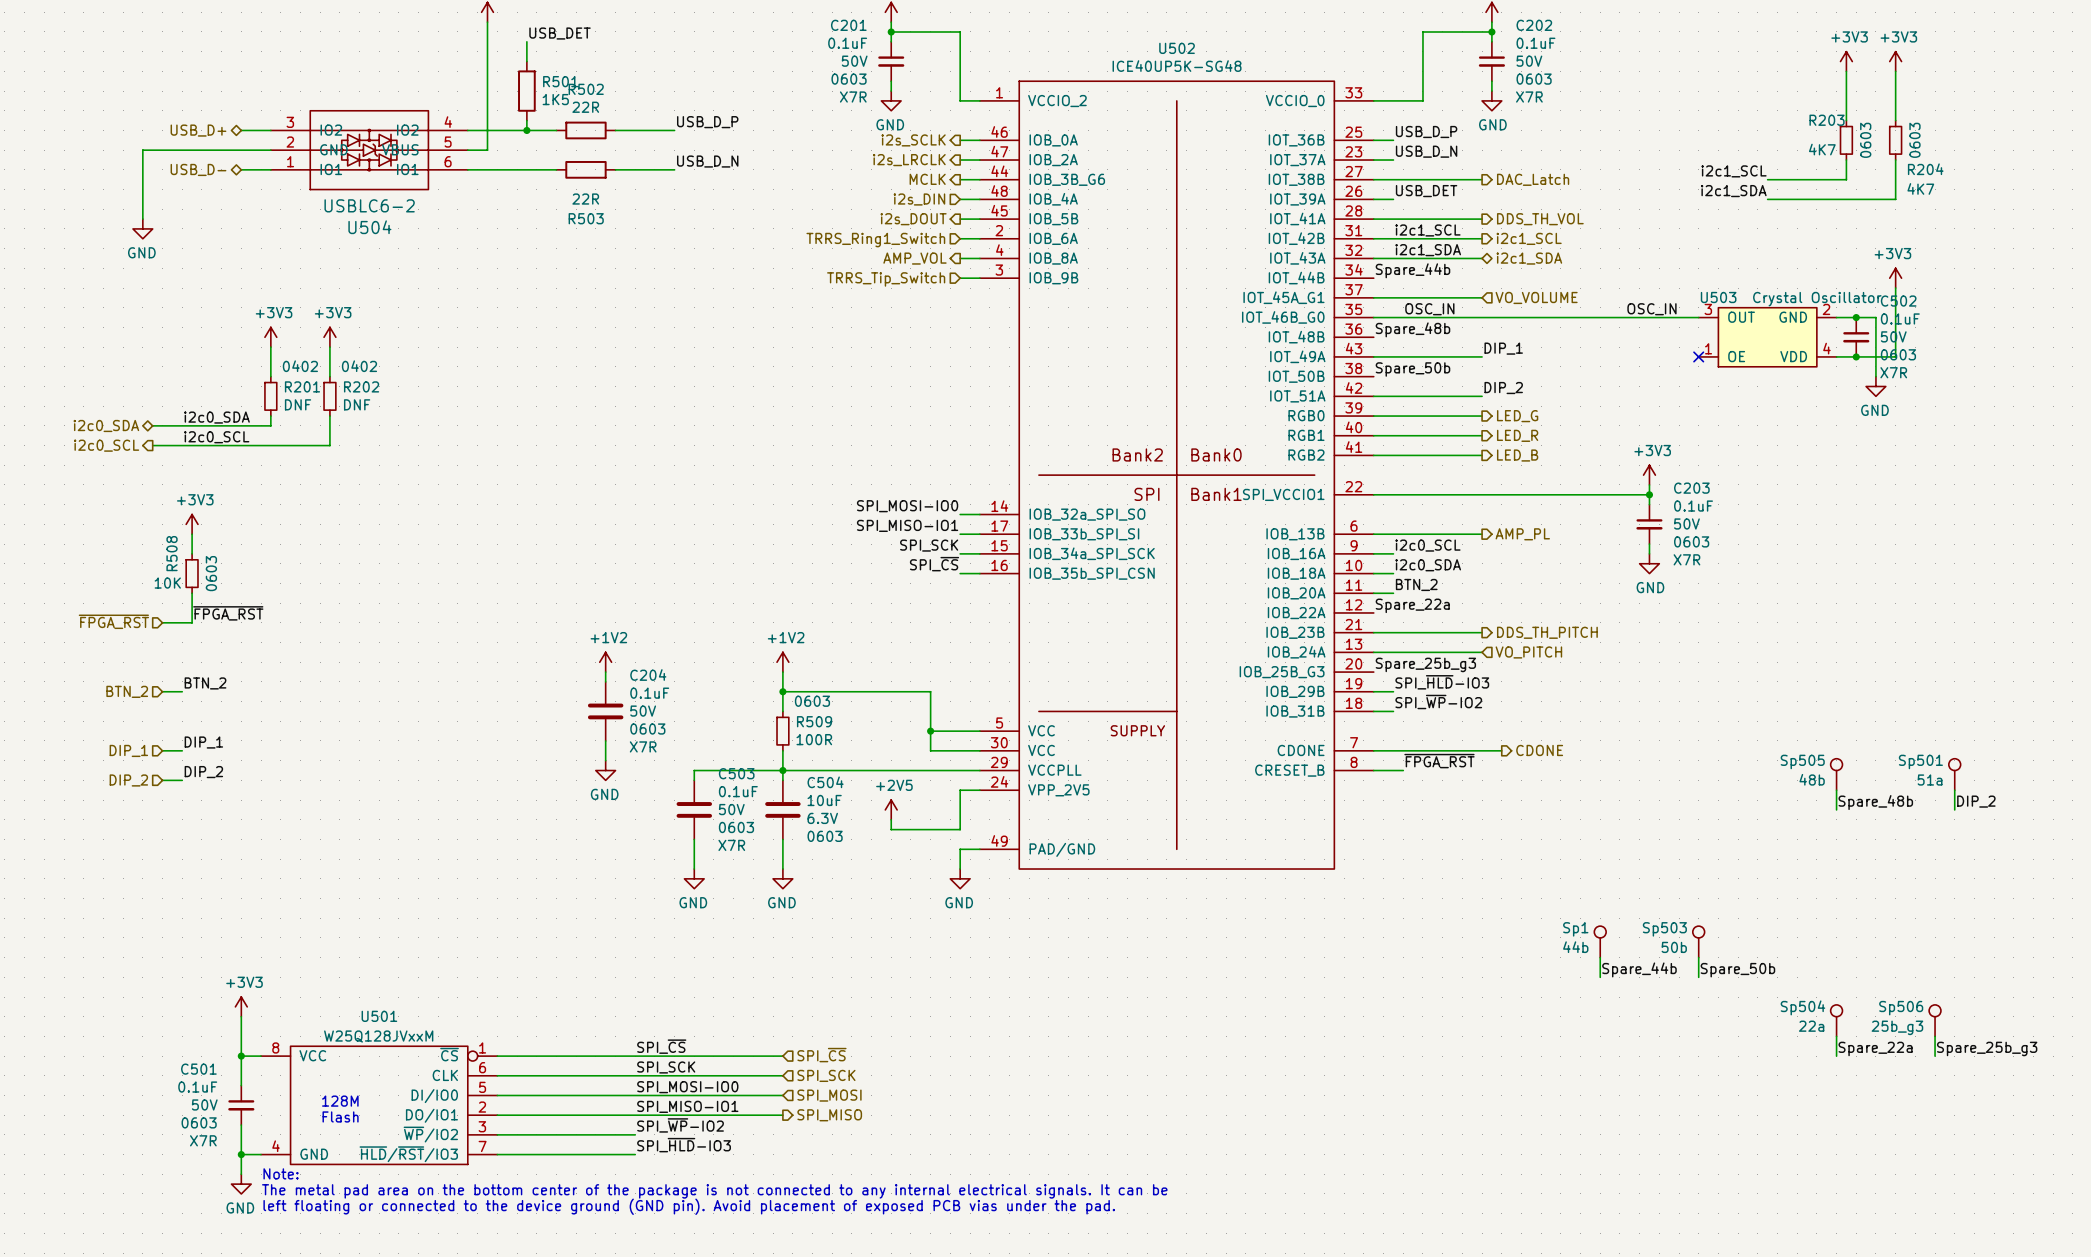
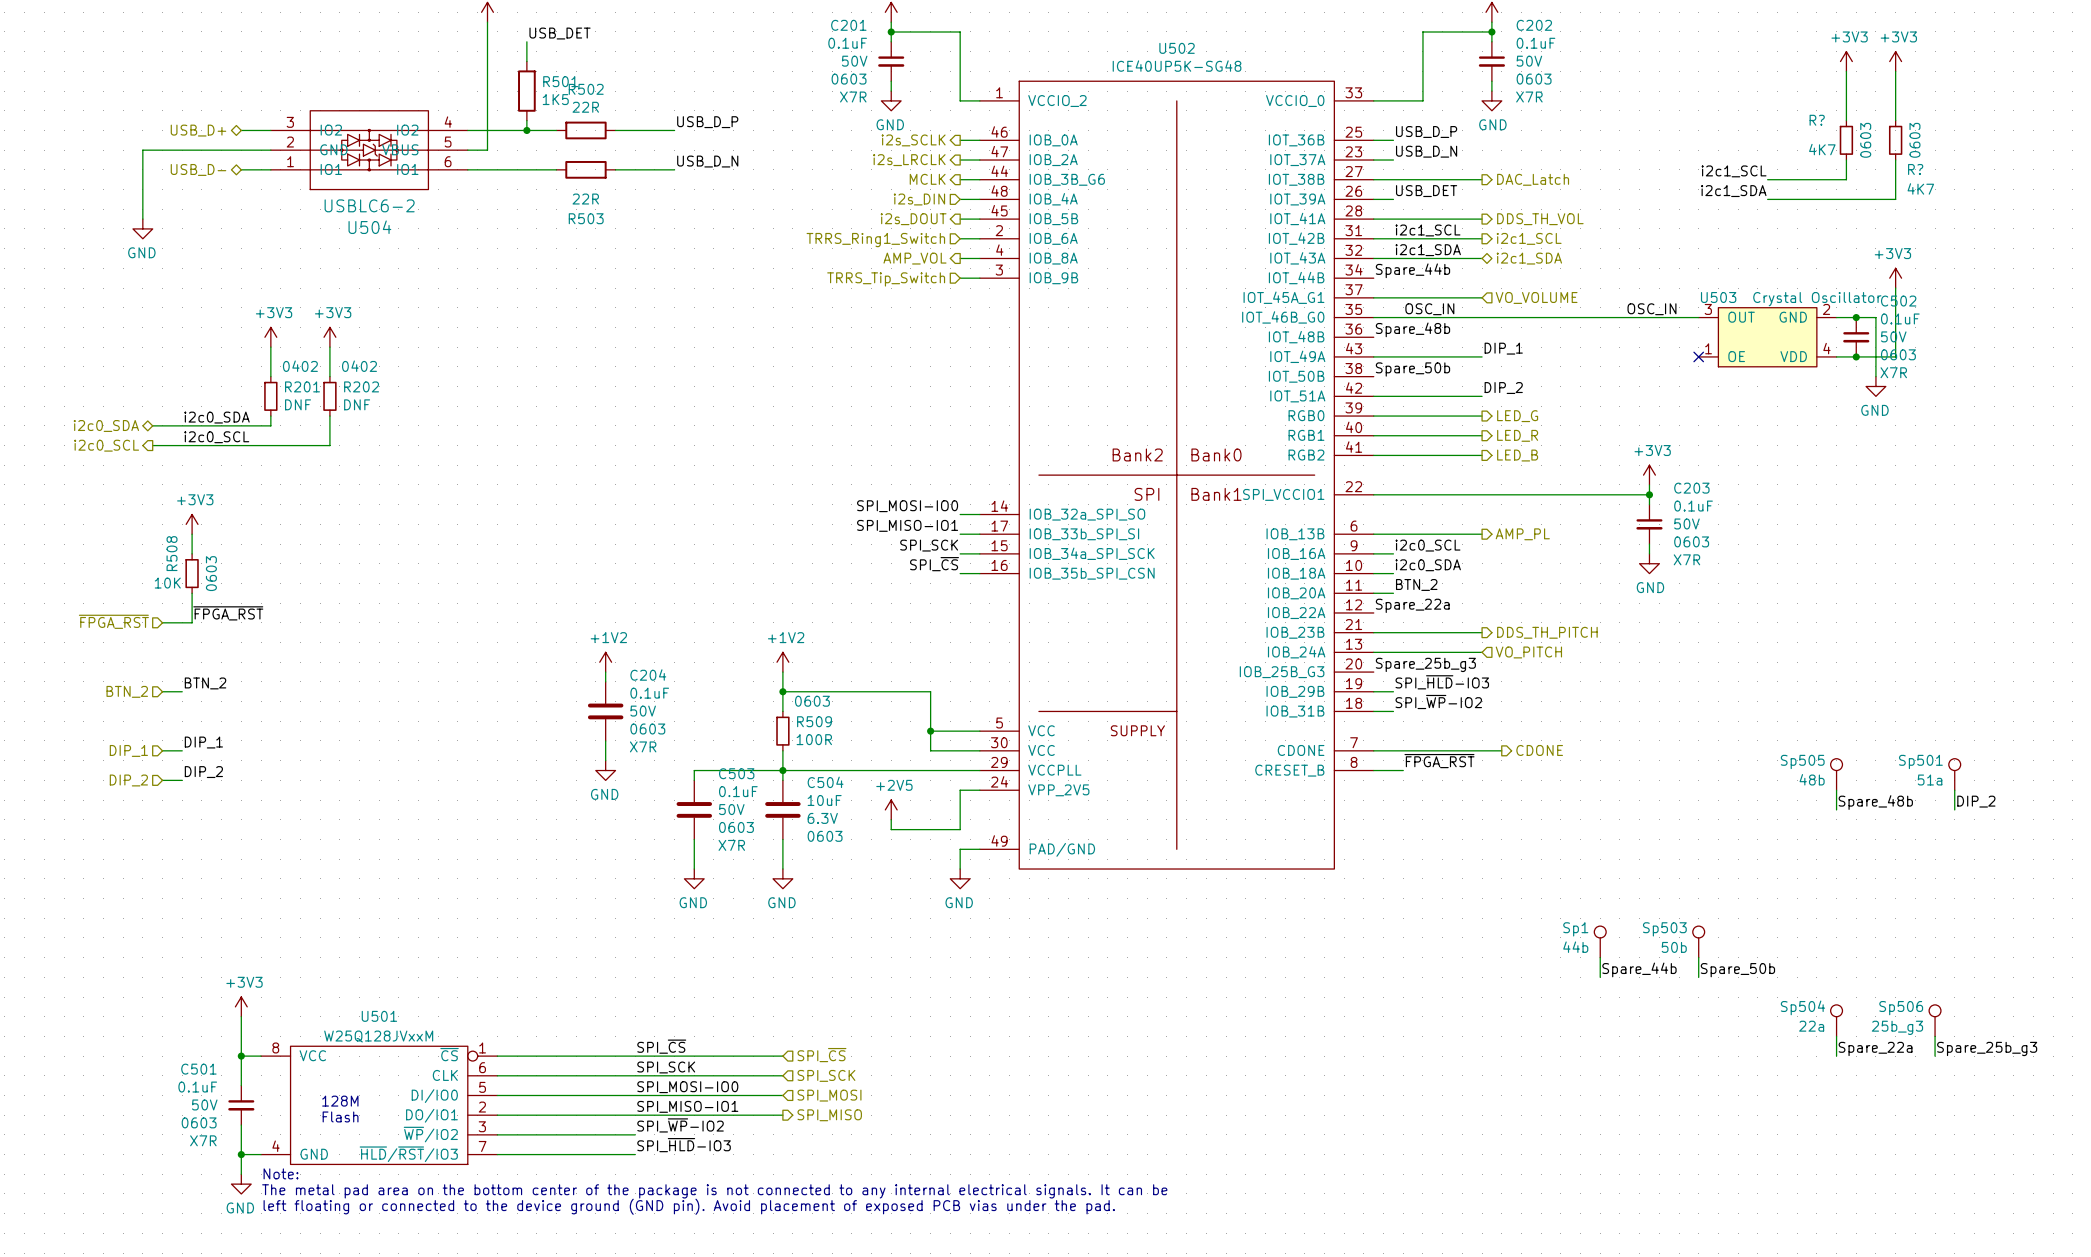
R203 name: R203 (1827, 120) -> R? (1817, 120)
R204 name: R204 (1925, 169) -> R? (1915, 169)

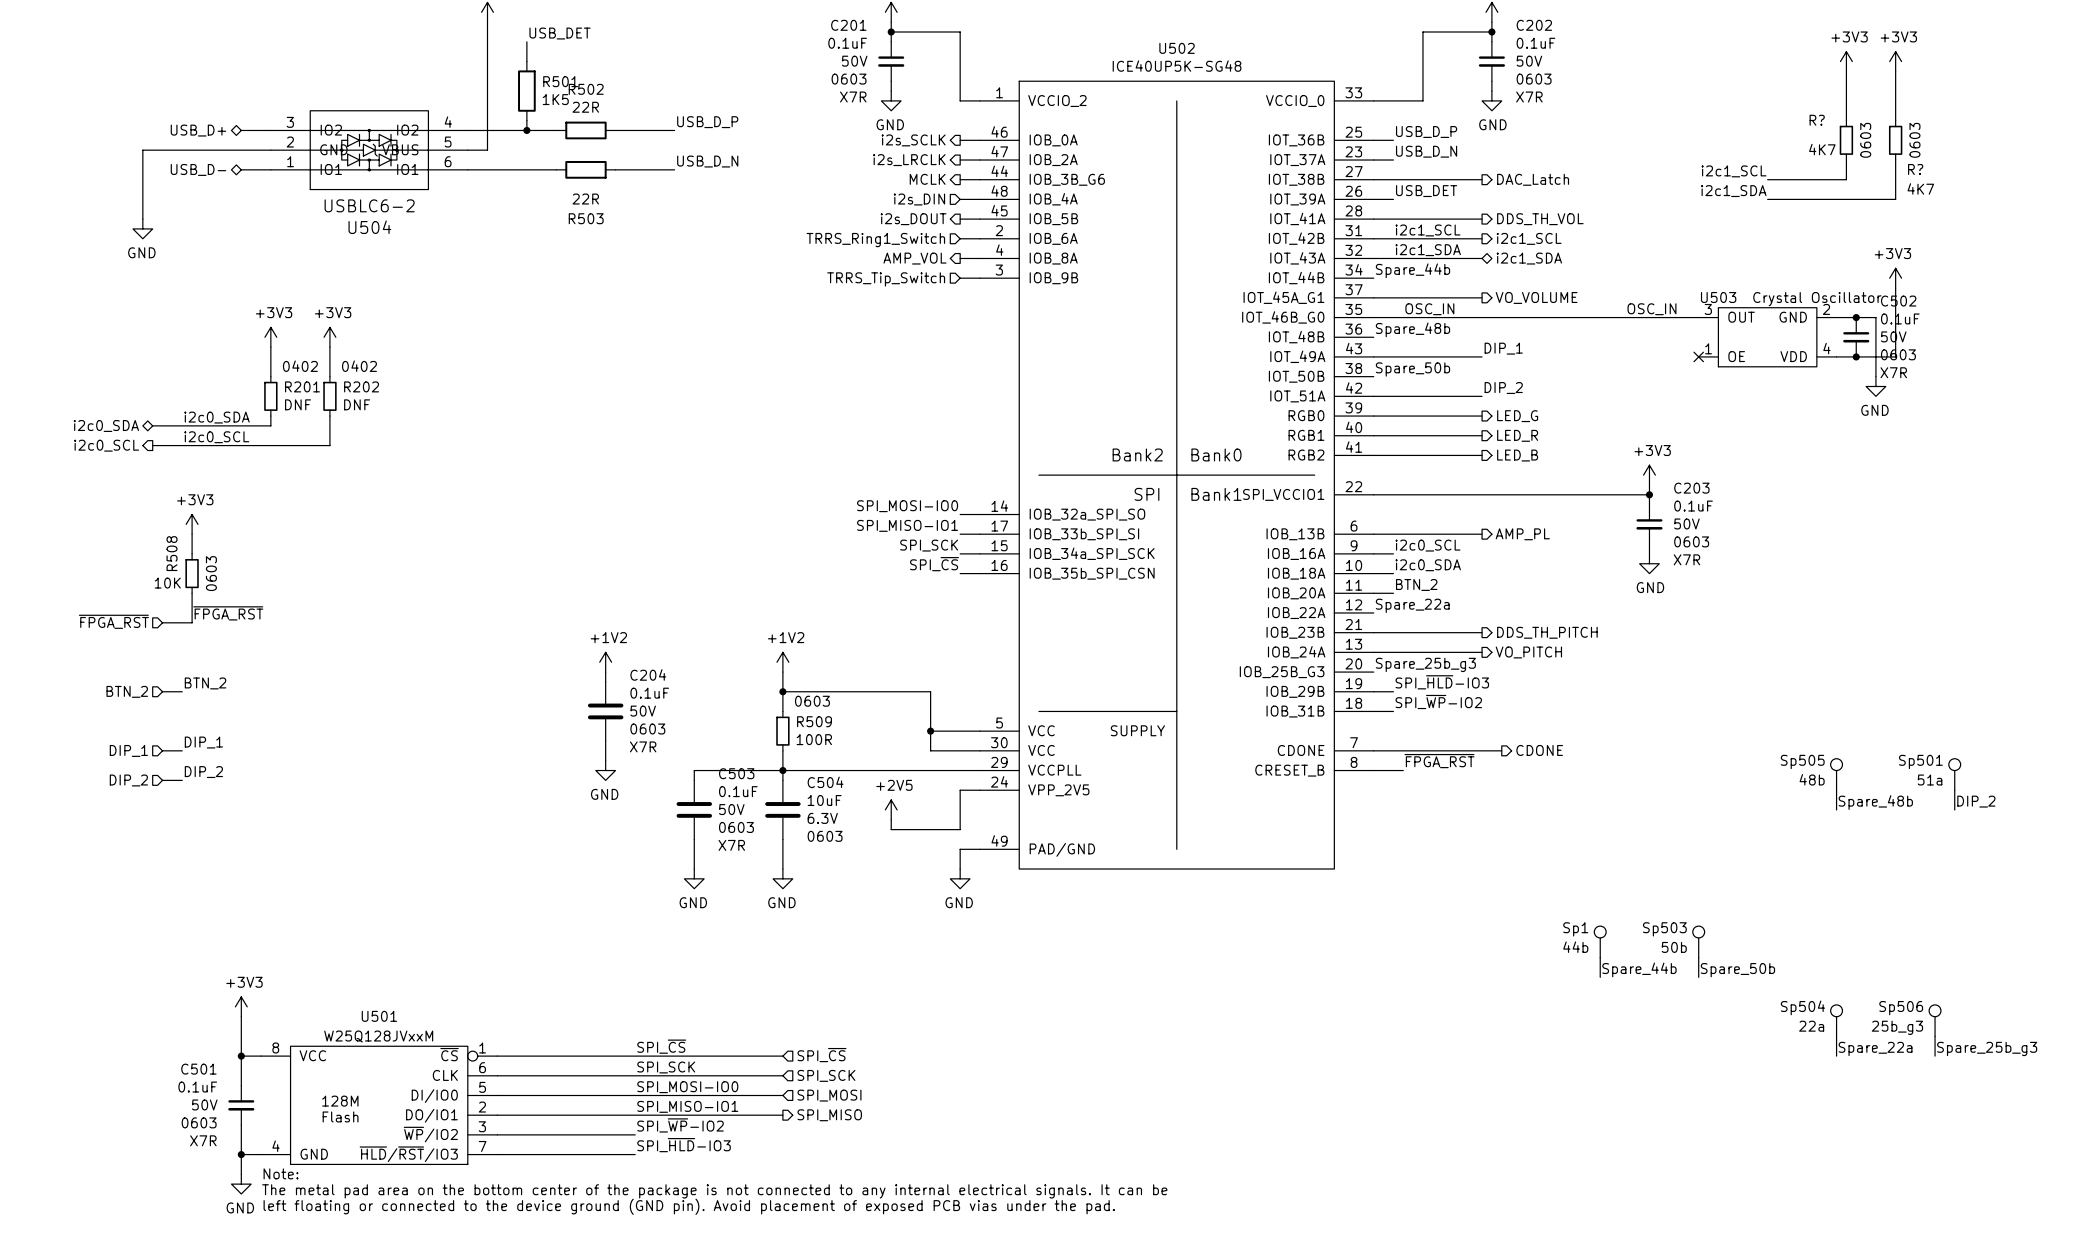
hierarchical label shape: input (1536, 297) -> output (1536, 297)
hierarchical label shape: input (1528, 652) -> output (1528, 652)

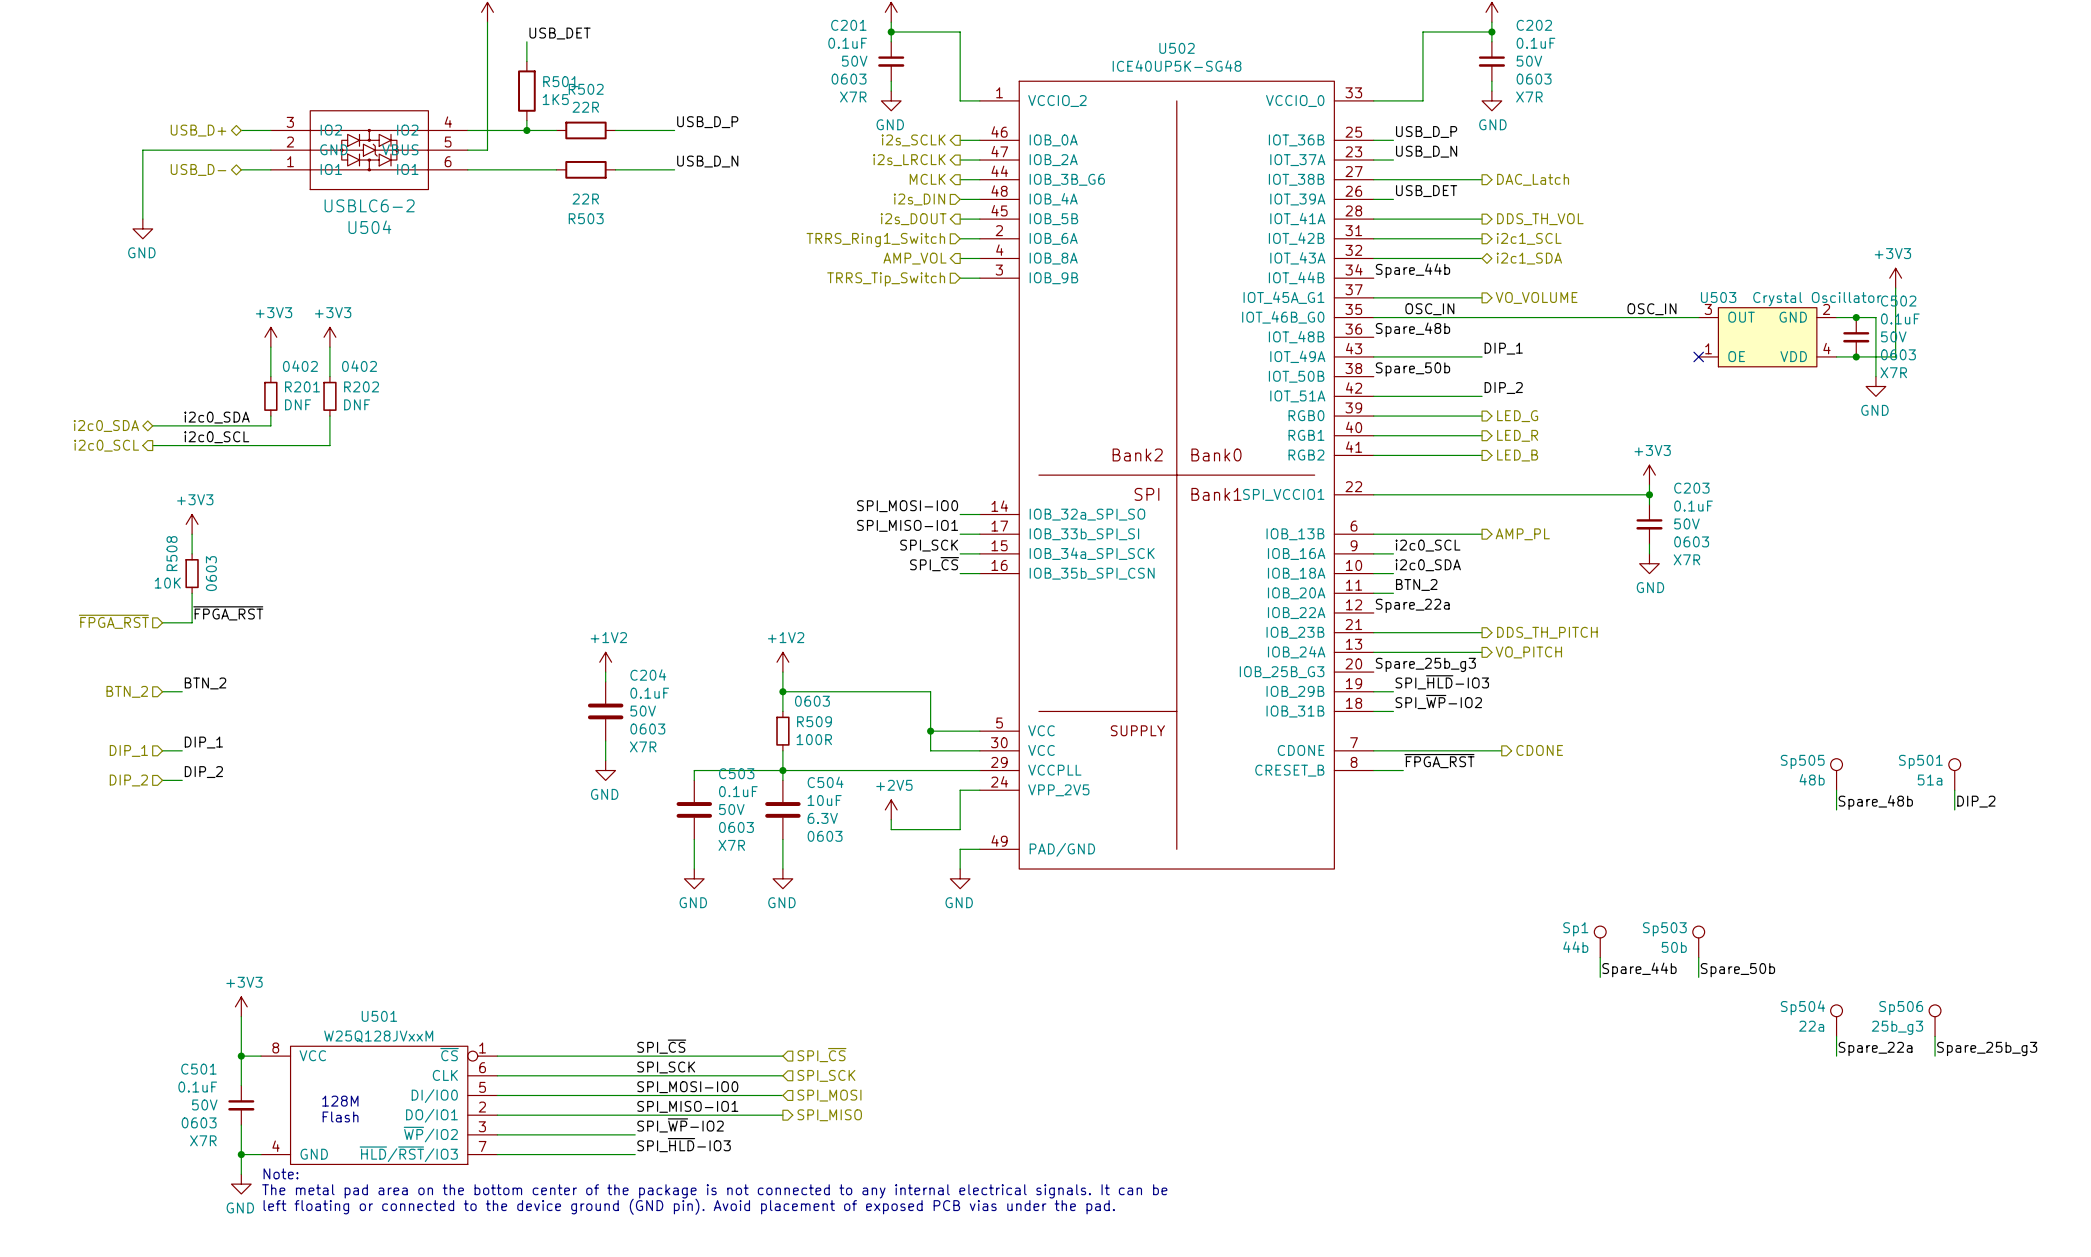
power symbol: +3V3 (1846, 61) -> none
power symbol: +3V3 (1895, 61) -> none
wire: (1846, 71) (1846, 120) -> none
wire: (1895, 71) (1895, 120) -> none
R?: 4K7 (1846, 140) -> none
R?: 4K7 (1895, 140) -> none
wire: (1846, 160) (1846, 179) (1767, 179) -> none
wire: (1895, 160) (1895, 199) (1767, 199) -> none
label: i2c1_SCL (1734, 171) -> none
label: i2c1_SDA (1733, 191) -> none
label: i2c1_SCL (1427, 230) -> none
label: i2c1_SDA (1428, 250) -> none

